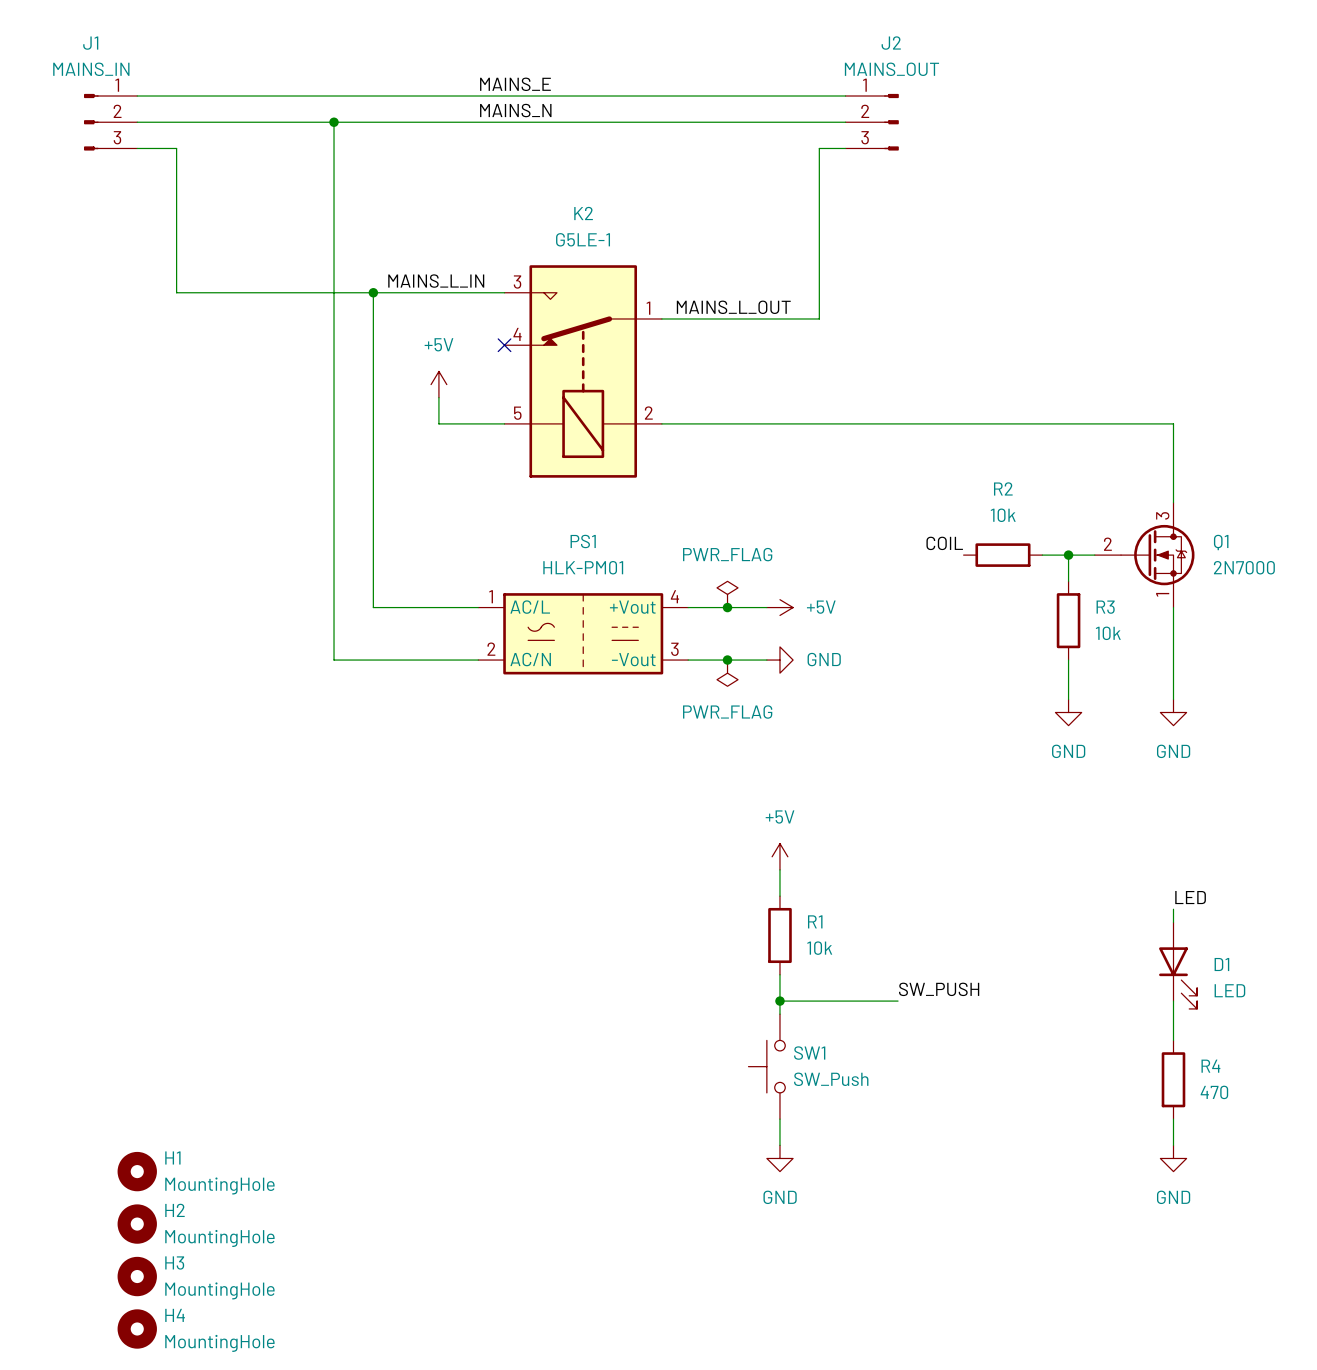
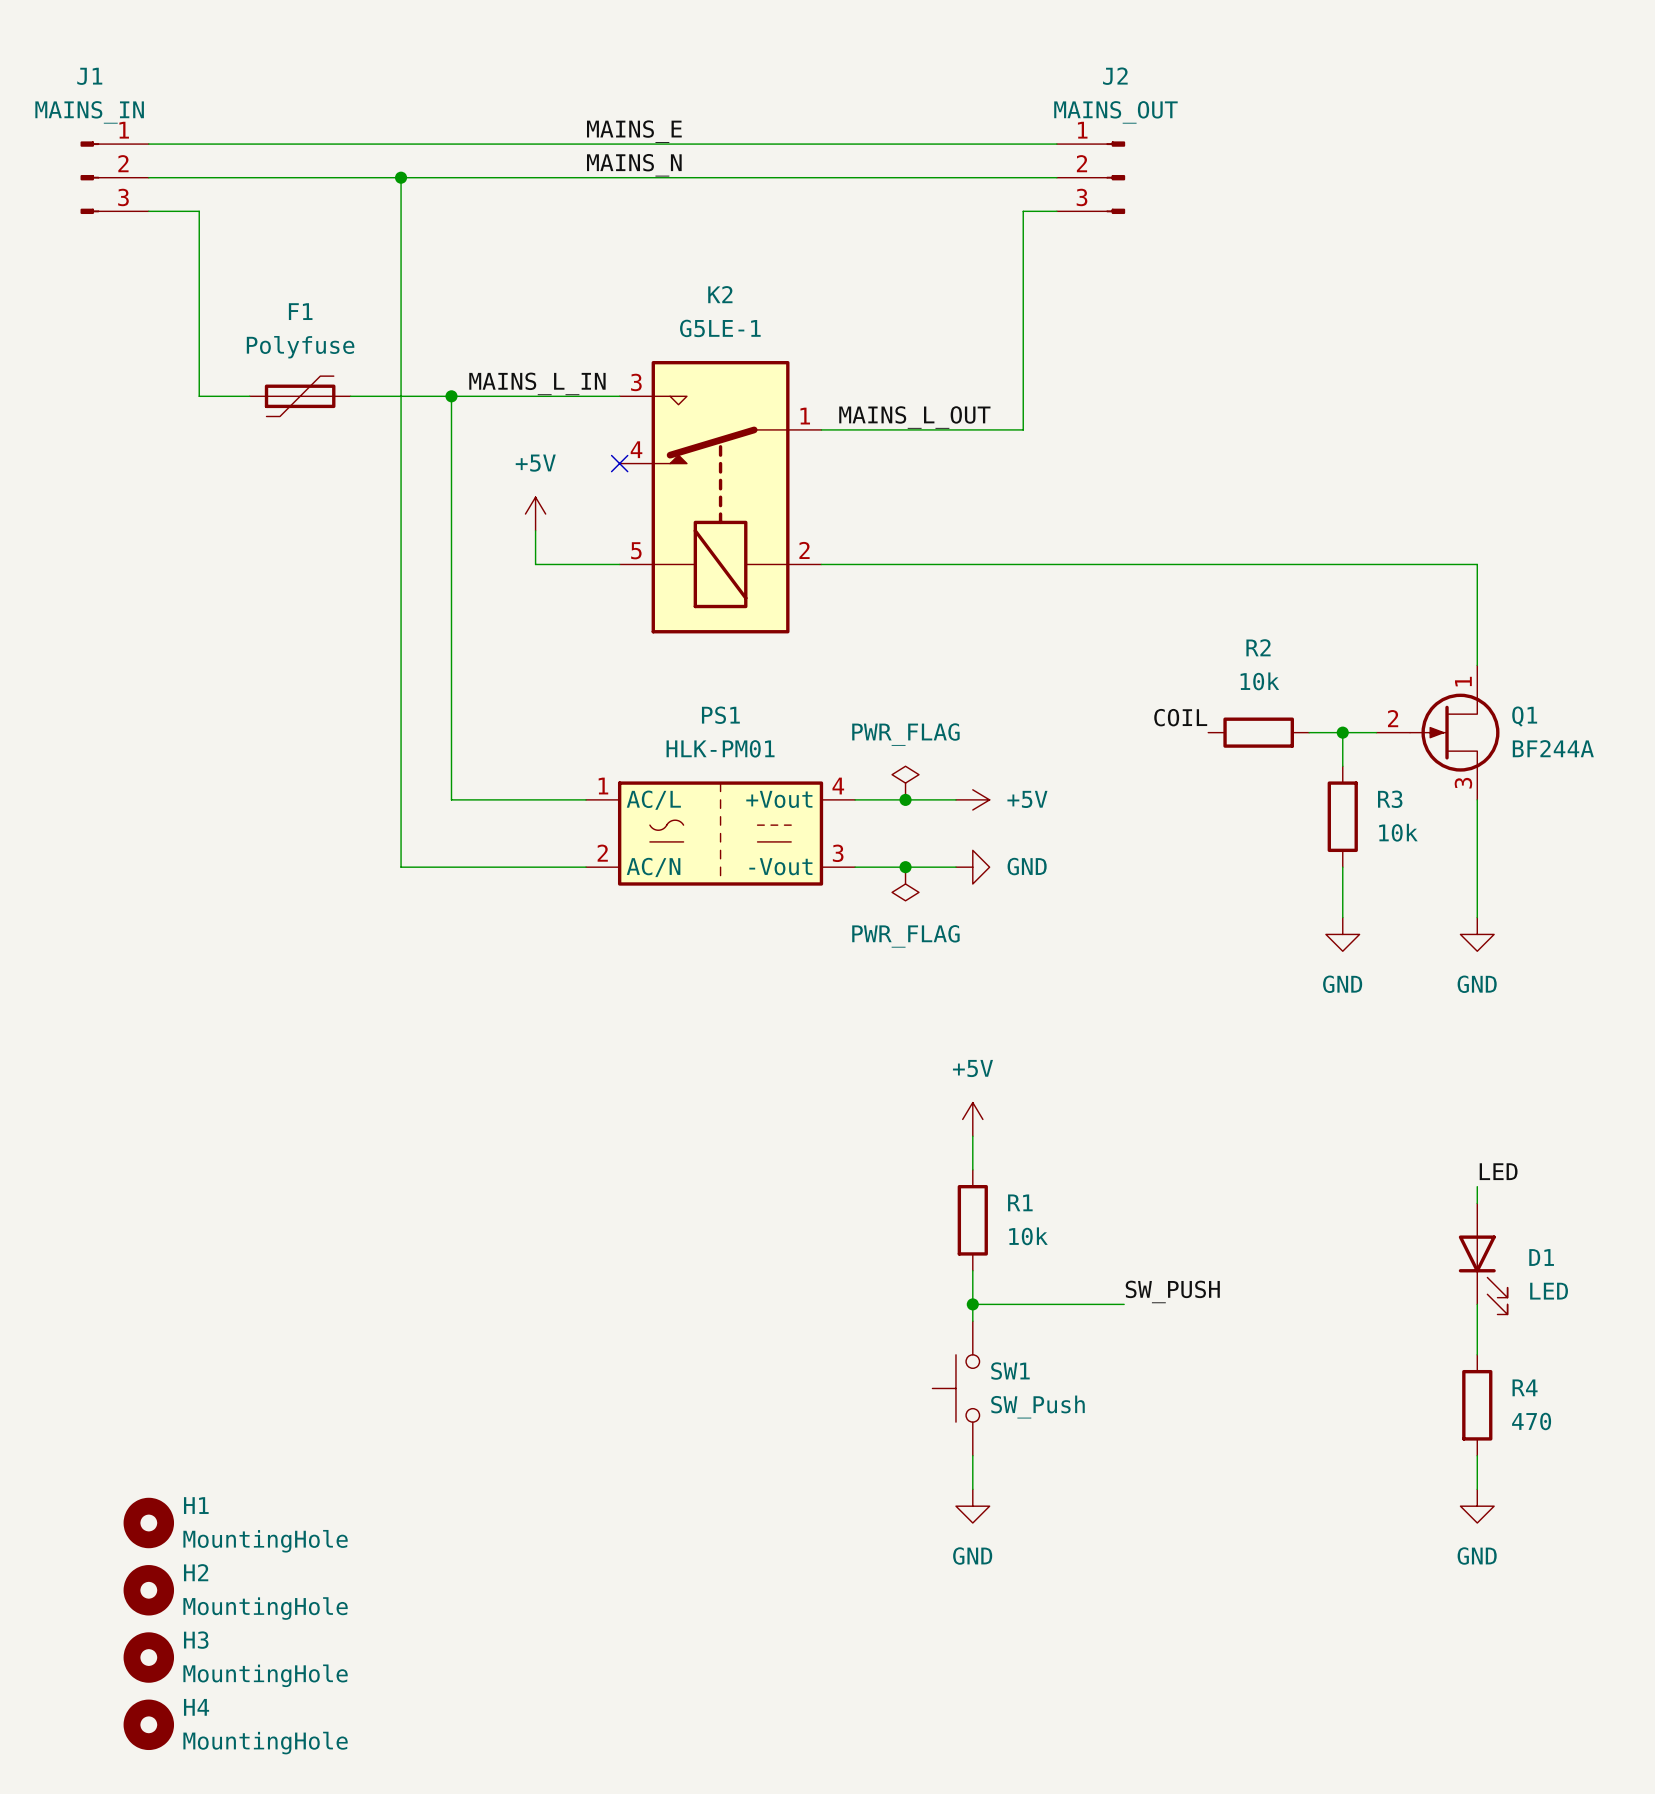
F1: none -> Polyfuse (300, 396)
Q1 symbol: [1094, 502, 1195, 608] -> [1376, 665, 1500, 800]
Q1 value: 2N7000 (1244, 567) -> BF244A (1553, 748)

